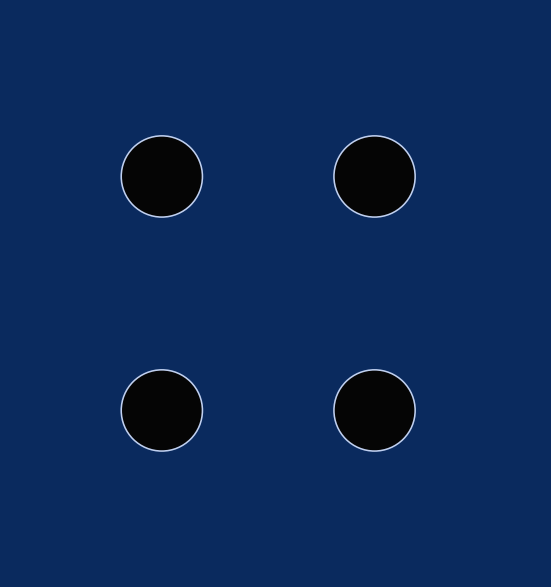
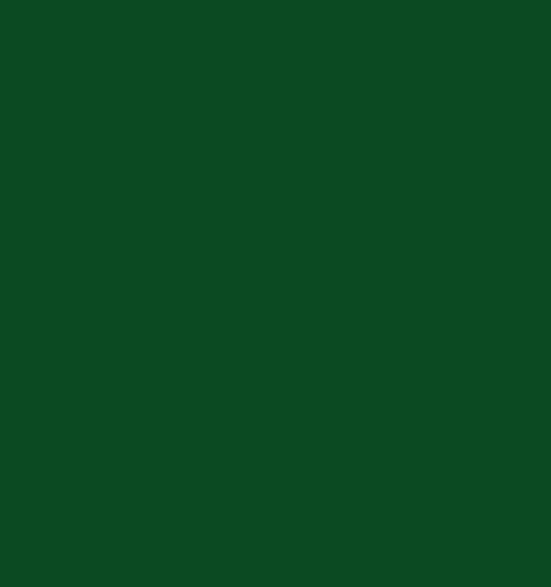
part: (161, 176) -> none
part: (374, 176) -> none
part: (161, 410) -> none
part: (374, 410) -> none

